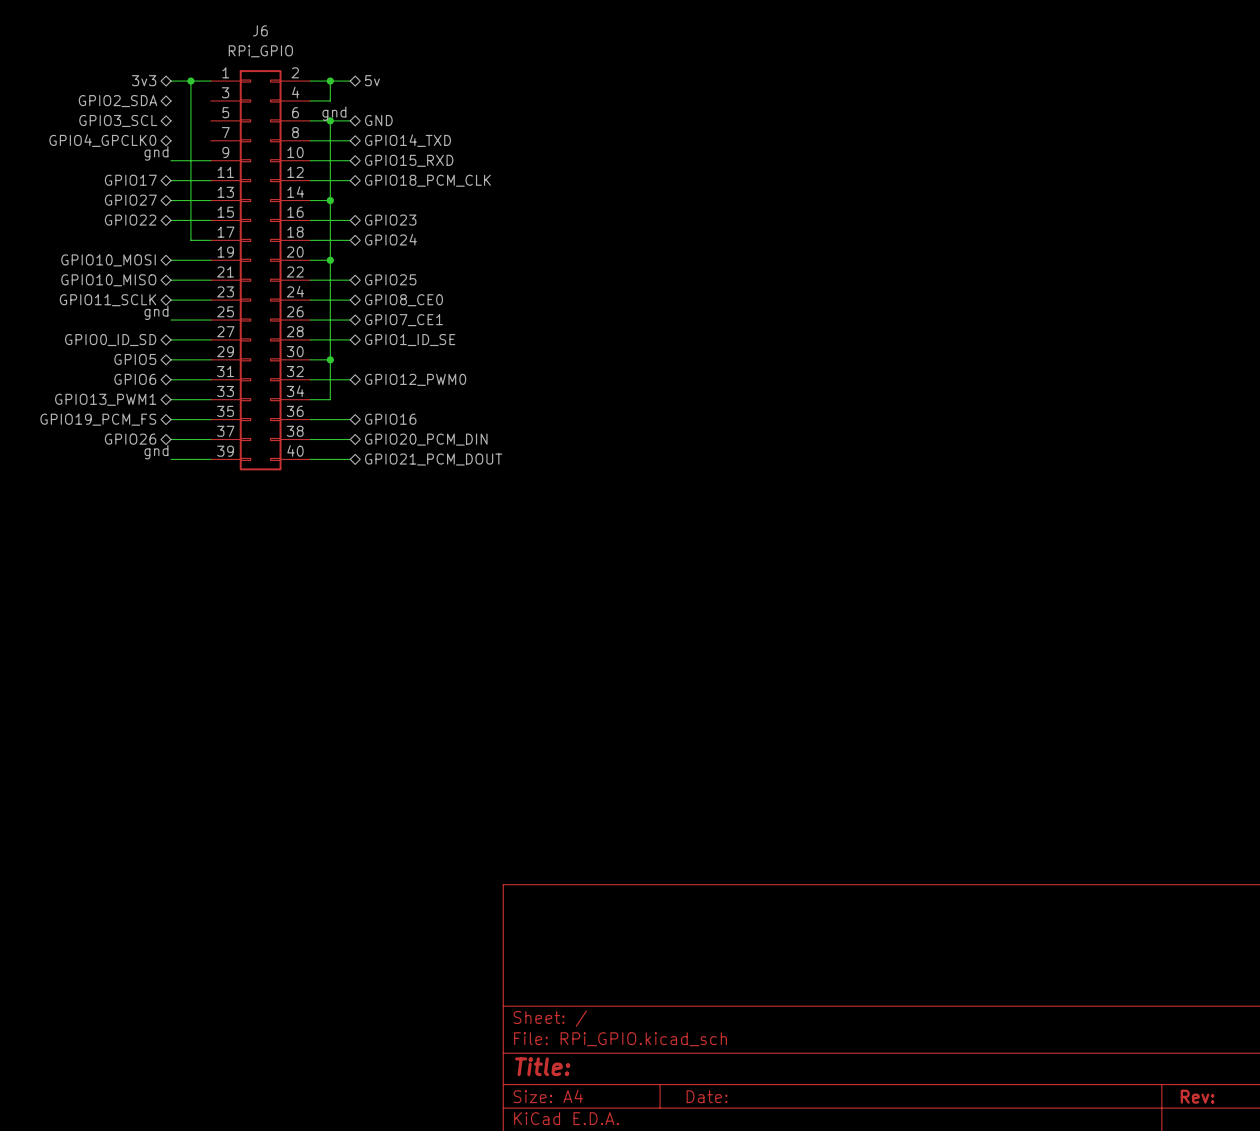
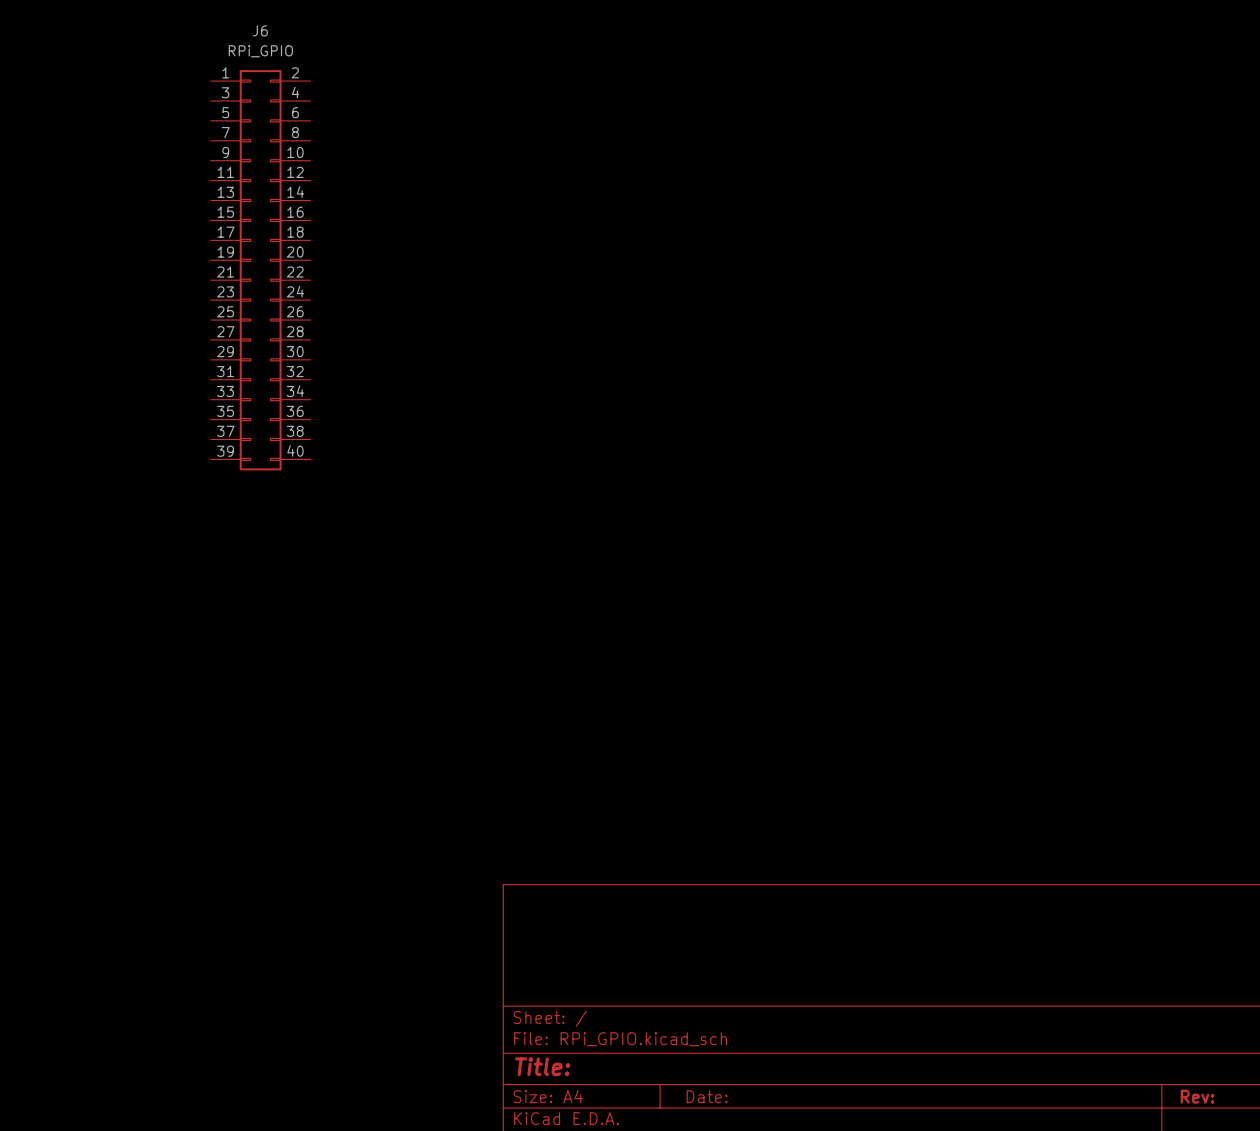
hierarchical label: 3v3 (144, 80) -> none
hierarchical label: 5v (372, 80) -> none
wire: (171, 81) (210, 81) -> none
wire: (190, 81) (190, 240) (210, 240) -> none
junction: (190, 81) -> none
wire: (310, 81) (350, 81) -> none
wire: (330, 81) (330, 100) (310, 100) -> none
junction: (330, 81) -> none
hierarchical label: GPIO2_SDA (118, 101) -> none
label: gnd (334, 113) -> none
hierarchical label: GPIO3_SCL (118, 120) -> none
wire: (310, 120) (350, 120) -> none
wire: (330, 120) (330, 399) (310, 399) -> none
junction: (330, 120) -> none
hierarchical label: GND (378, 120) -> none
hierarchical label: GPIO4_GPCLK0 (102, 140) -> none
wire: (310, 140) (350, 140) -> none
hierarchical label: GPIO14_TXD (408, 140) -> none
label: gnd (156, 153) -> none
wire: (171, 160) (210, 160) -> none
wire: (310, 160) (350, 160) -> none
hierarchical label: GPIO15_RXD (409, 160) -> none
hierarchical label: GPIO17 (130, 180) -> none
wire: (171, 180) (210, 180) -> none
wire: (310, 180) (350, 180) -> none
hierarchical label: GPIO18_PCM_CLK (427, 180) -> none
hierarchical label: GPIO27 (130, 200) -> none
wire: (171, 200) (210, 200) -> none
wire: (310, 200) (330, 200) -> none
junction: (330, 200) -> none
hierarchical label: GPIO22 (130, 220) -> none
wire: (171, 220) (210, 220) -> none
wire: (310, 220) (350, 220) -> none
hierarchical label: GPIO23 (390, 220) -> none
hierarchical label: GPIO24 (390, 239) -> none
wire: (310, 240) (350, 240) -> none
hierarchical label: GPIO10_MOSI (108, 260) -> none
wire: (171, 260) (210, 260) -> none
wire: (310, 260) (330, 260) -> none
junction: (330, 260) -> none
hierarchical label: GPIO25 (390, 279) -> none
hierarchical label: GPIO10_MISO (108, 280) -> none
wire: (171, 280) (210, 280) -> none
wire: (310, 280) (350, 280) -> none
hierarchical label: GPIO11_SCLK (108, 300) -> none
wire: (171, 300) (210, 300) -> none
wire: (310, 300) (350, 300) -> none
hierarchical label: GPIO8_CE0 (403, 300) -> none
label: gnd (156, 312) -> none
wire: (171, 320) (210, 320) -> none
wire: (310, 320) (350, 320) -> none
hierarchical label: GPIO7_CE1 (403, 320) -> none
wire: (171, 339) (210, 339) -> none
wire: (310, 339) (350, 339) -> none
hierarchical label: GPIO0_ID_SD (110, 340) -> none
hierarchical label: GPIO1_ID_SE (410, 340) -> none
hierarchical label: GPIO5 (135, 359) -> none
wire: (171, 359) (210, 359) -> none
wire: (310, 359) (330, 359) -> none
junction: (330, 359) -> none
hierarchical label: GPIO6 (135, 379) -> none
wire: (171, 379) (210, 379) -> none
wire: (310, 379) (350, 379) -> none
hierarchical label: GPIO12_PWM0 (415, 379) -> none
hierarchical label: GPIO13_PWM1 (105, 399) -> none
wire: (171, 399) (210, 399) -> none
hierarchical label: GPIO19_PCM_FS (98, 419) -> none
wire: (171, 419) (210, 419) -> none
wire: (310, 419) (350, 419) -> none
hierarchical label: GPIO16 (390, 419) -> none
hierarchical label: GPIO26 (130, 439) -> none
wire: (171, 439) (210, 439) -> none
wire: (310, 439) (350, 439) -> none
hierarchical label: GPIO20_PCM_DIN (426, 439) -> none
label: gnd (156, 452) -> none
wire: (171, 459) (210, 459) -> none
wire: (310, 459) (350, 459) -> none
hierarchical label: GPIO21_PCM_DOUT (433, 459) -> none

